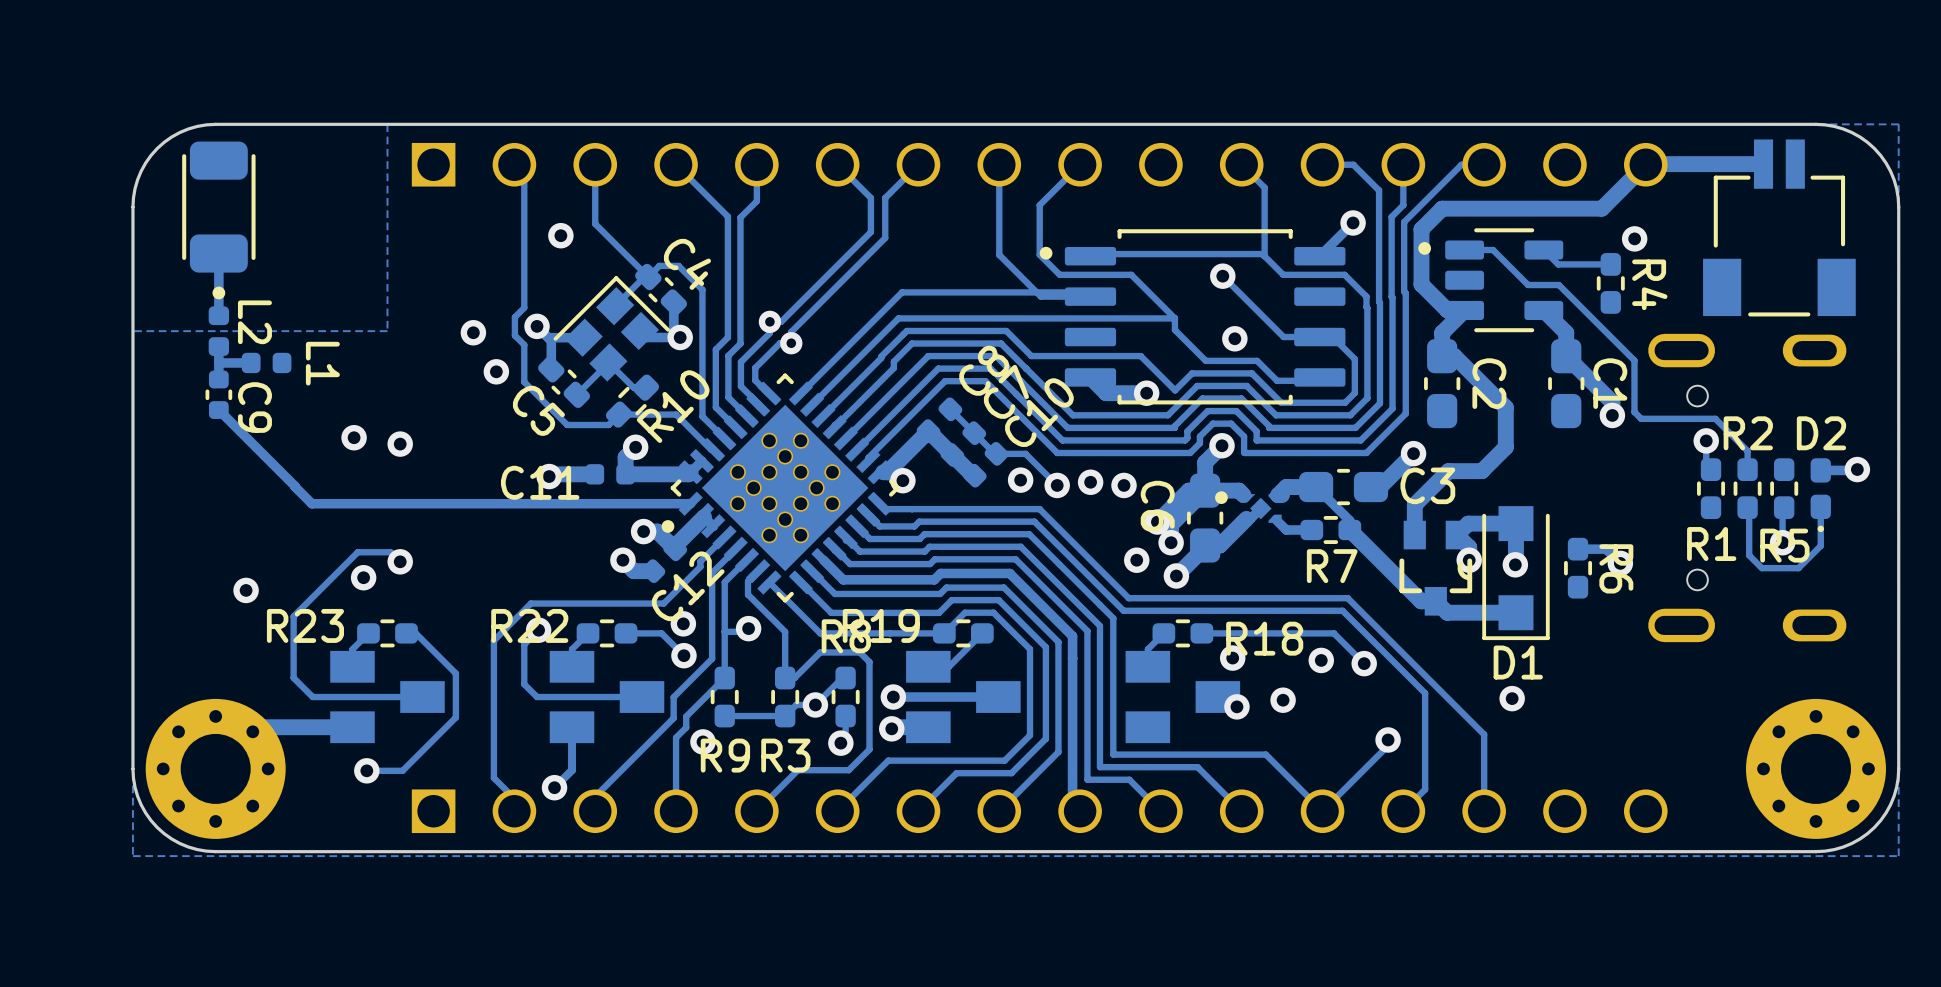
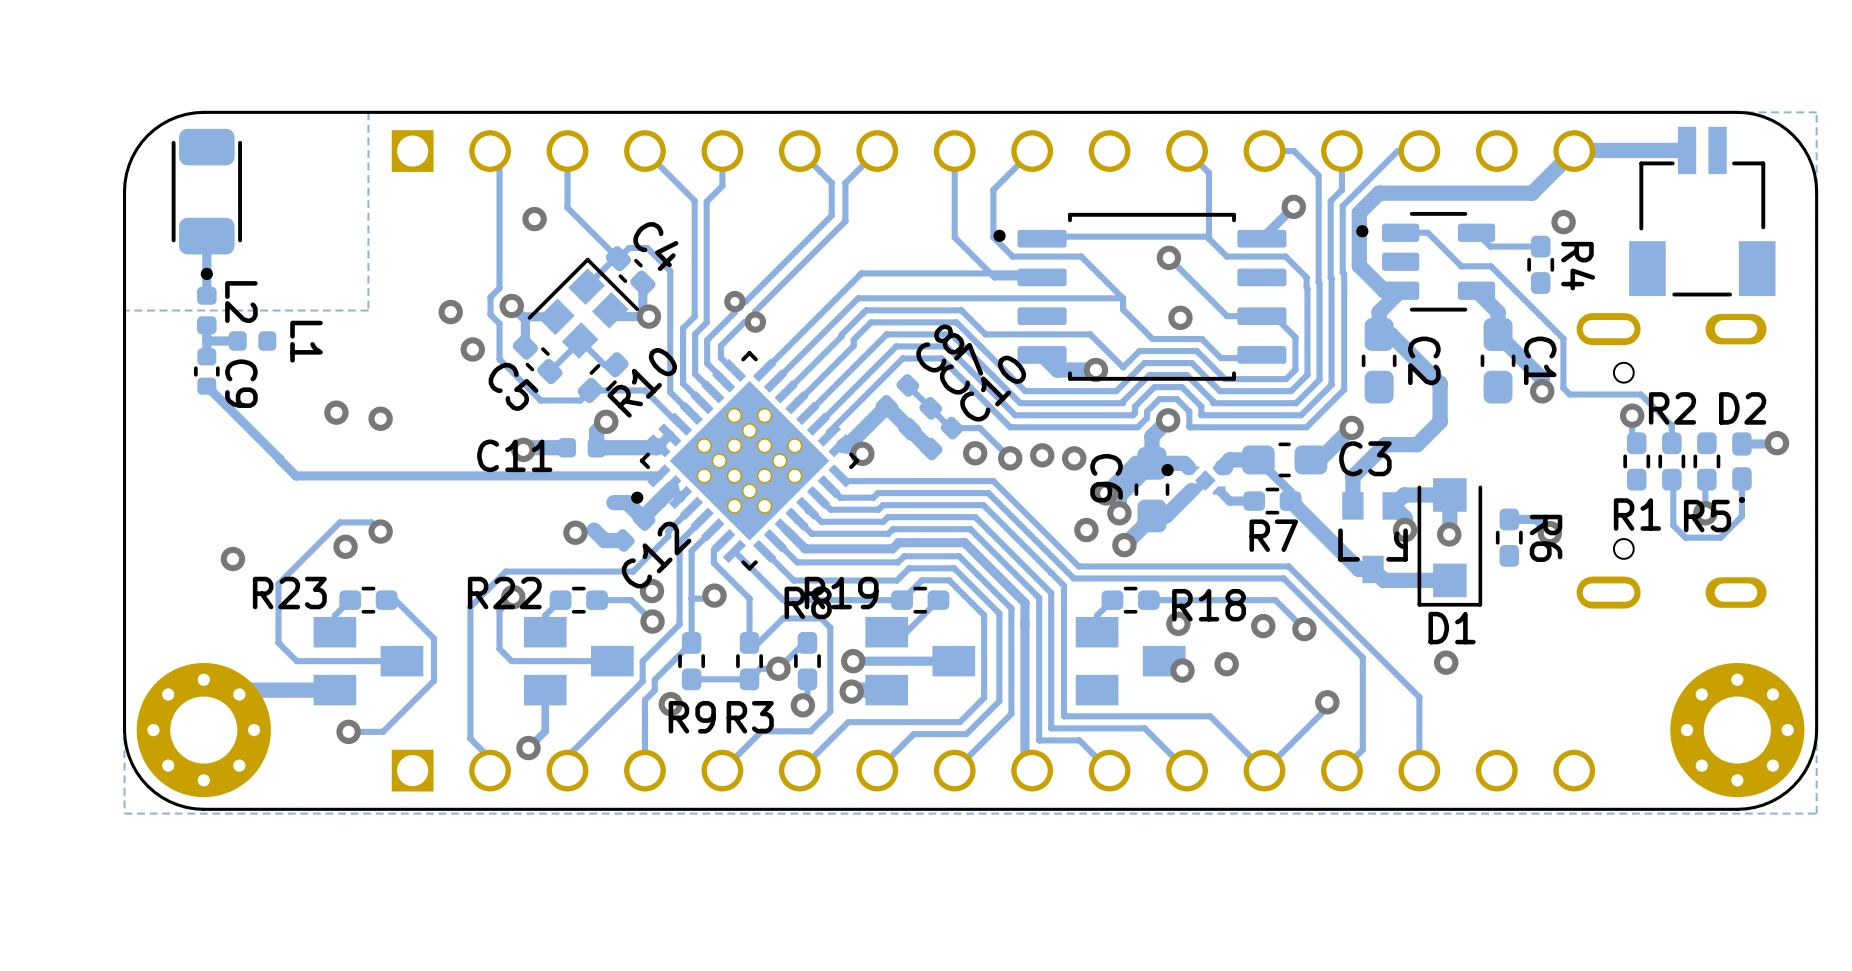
via: (643, 531) -> none
via position: (622, 560) -> (575, 532)

